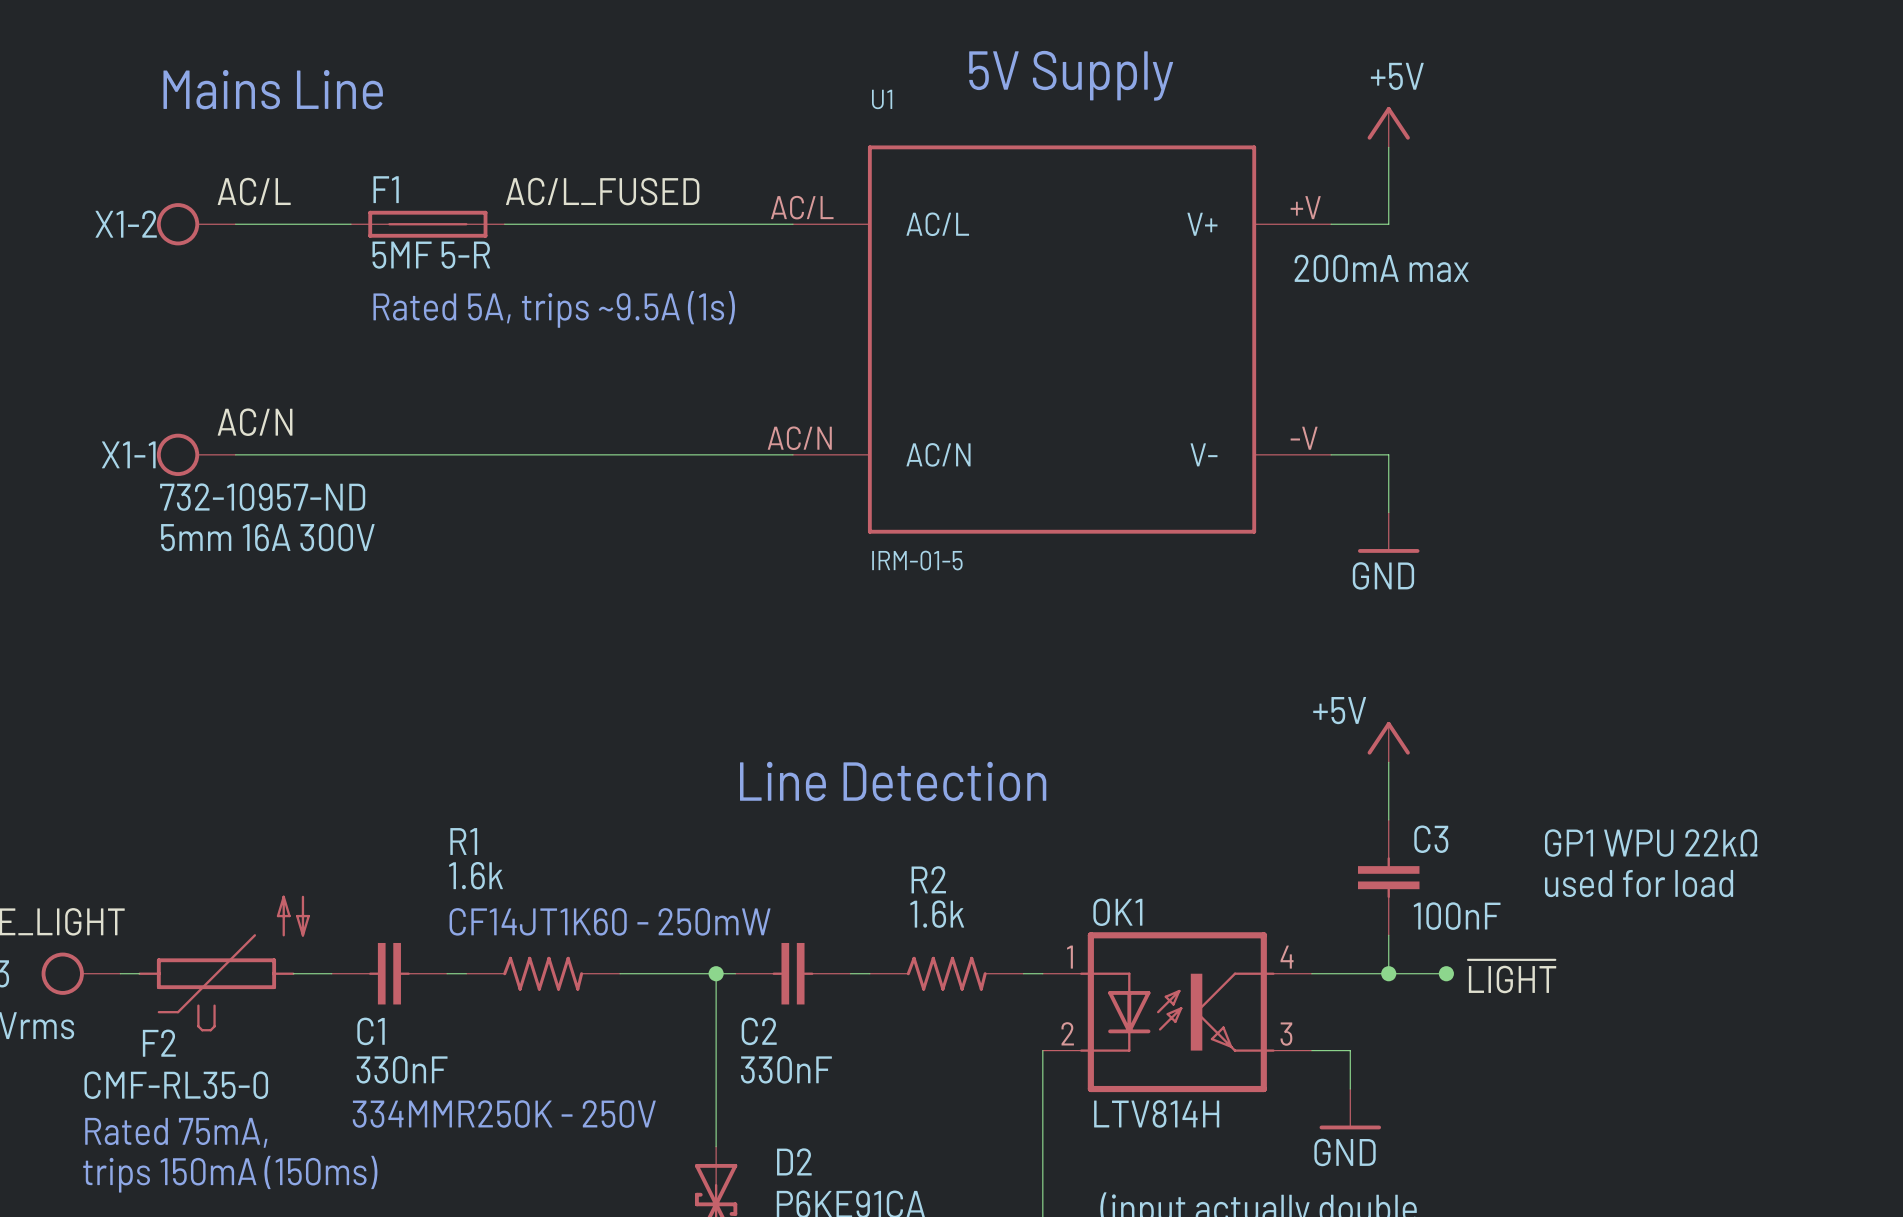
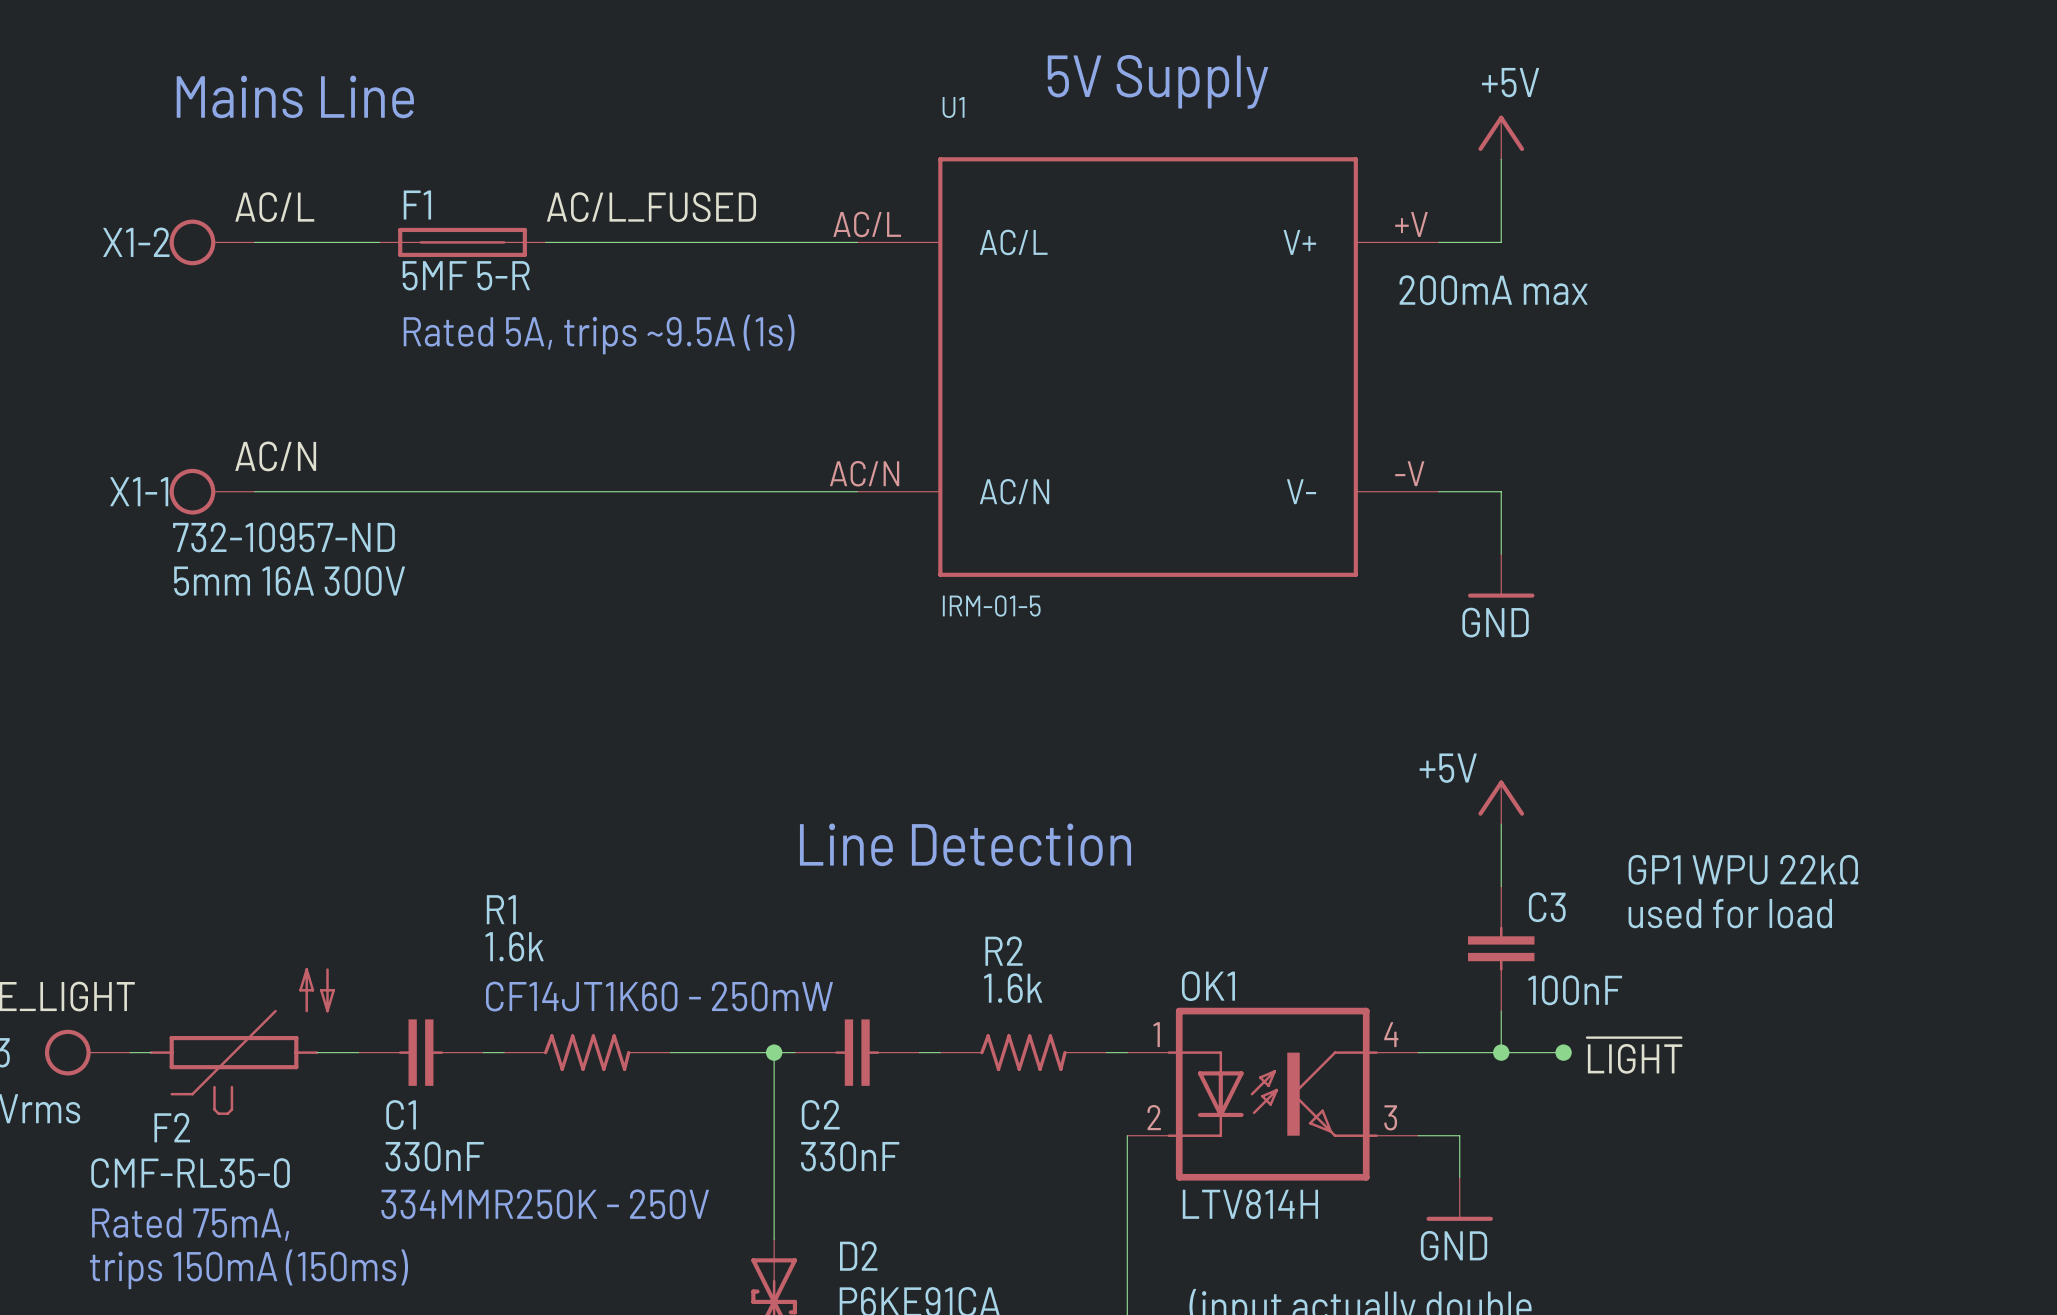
text position: GP1 WPU 22kΩ (1651, 843) -> GP1 WPU 22kΩ (1743, 869)
text position: used for load (1639, 883) -> used for load (1730, 913)

